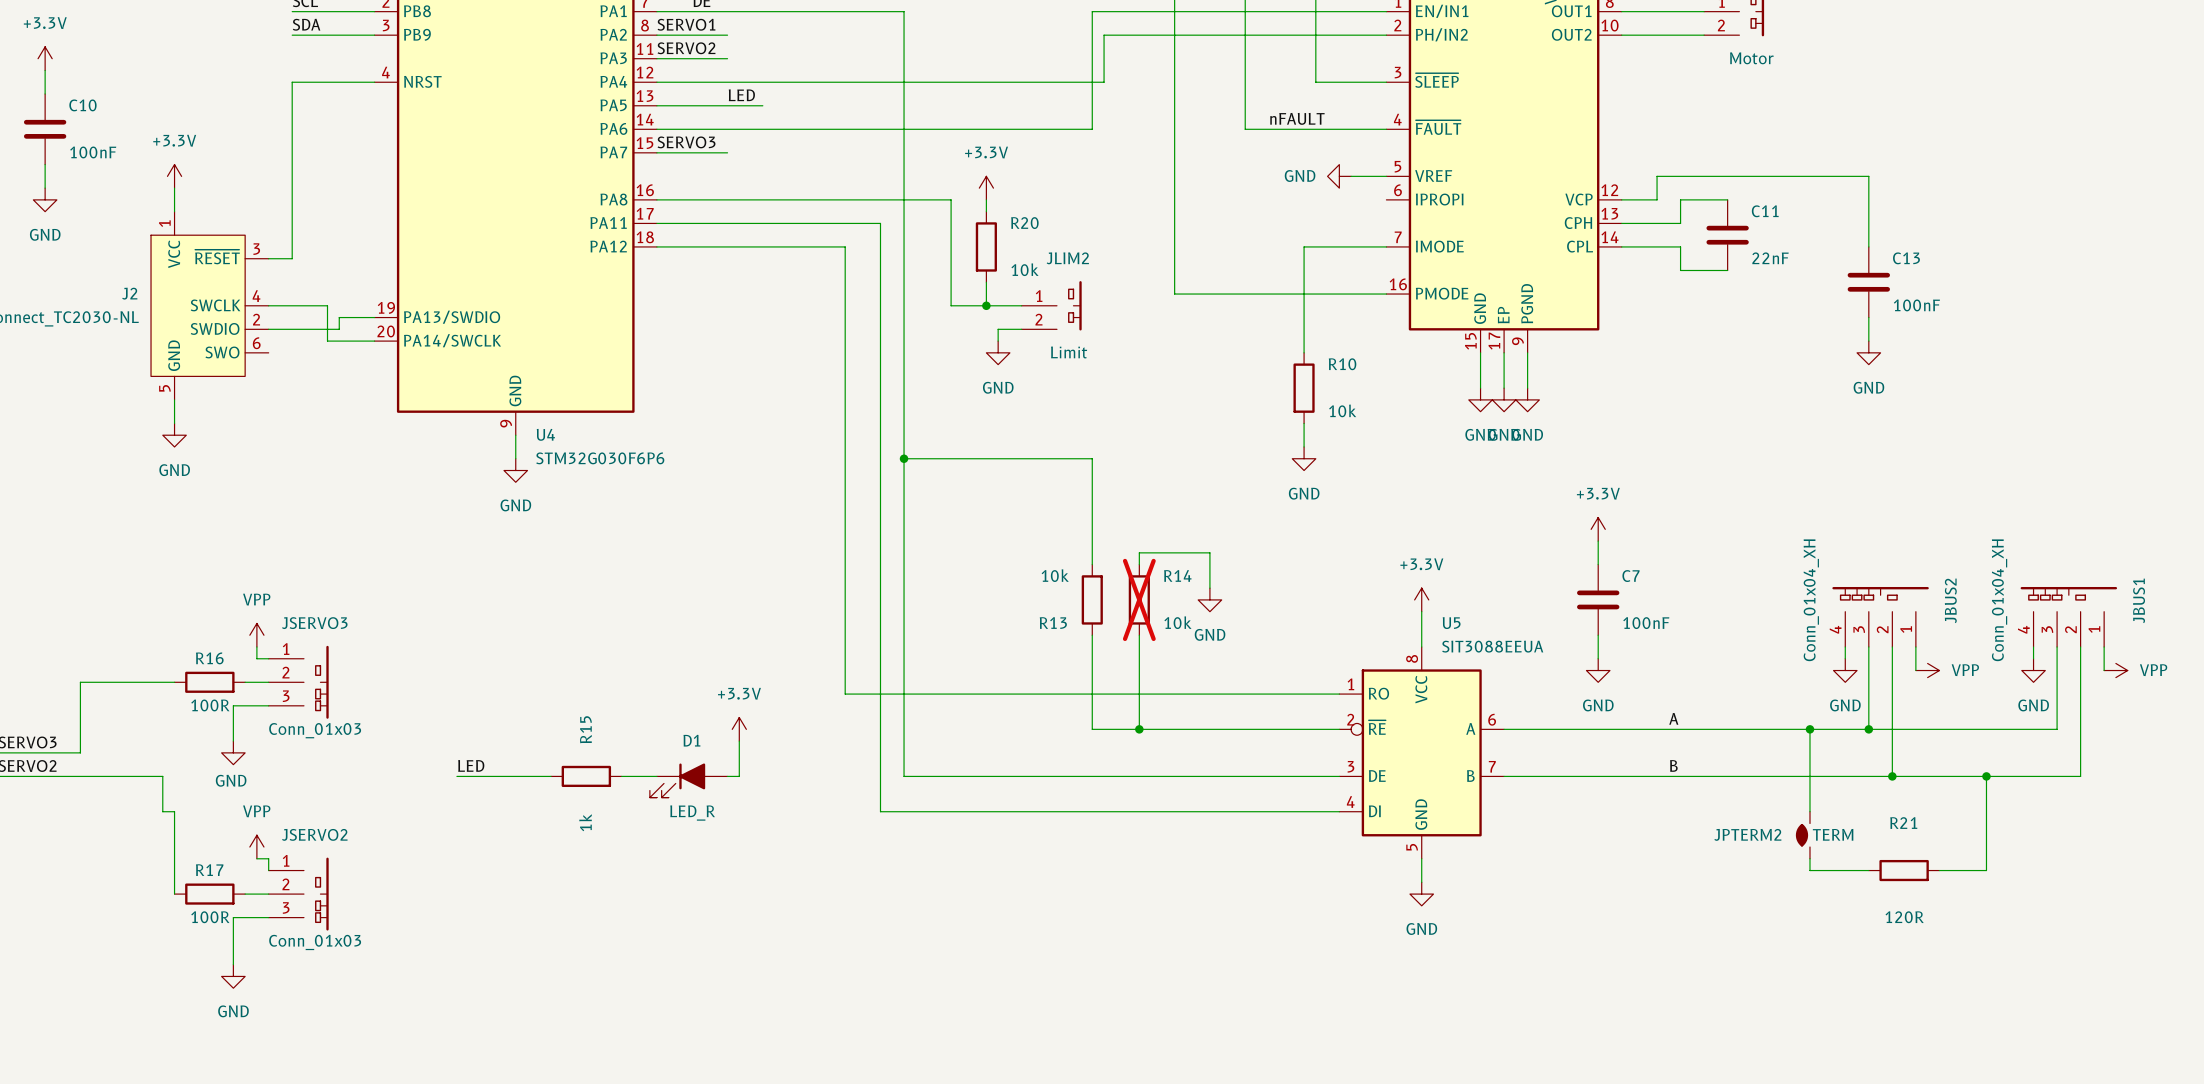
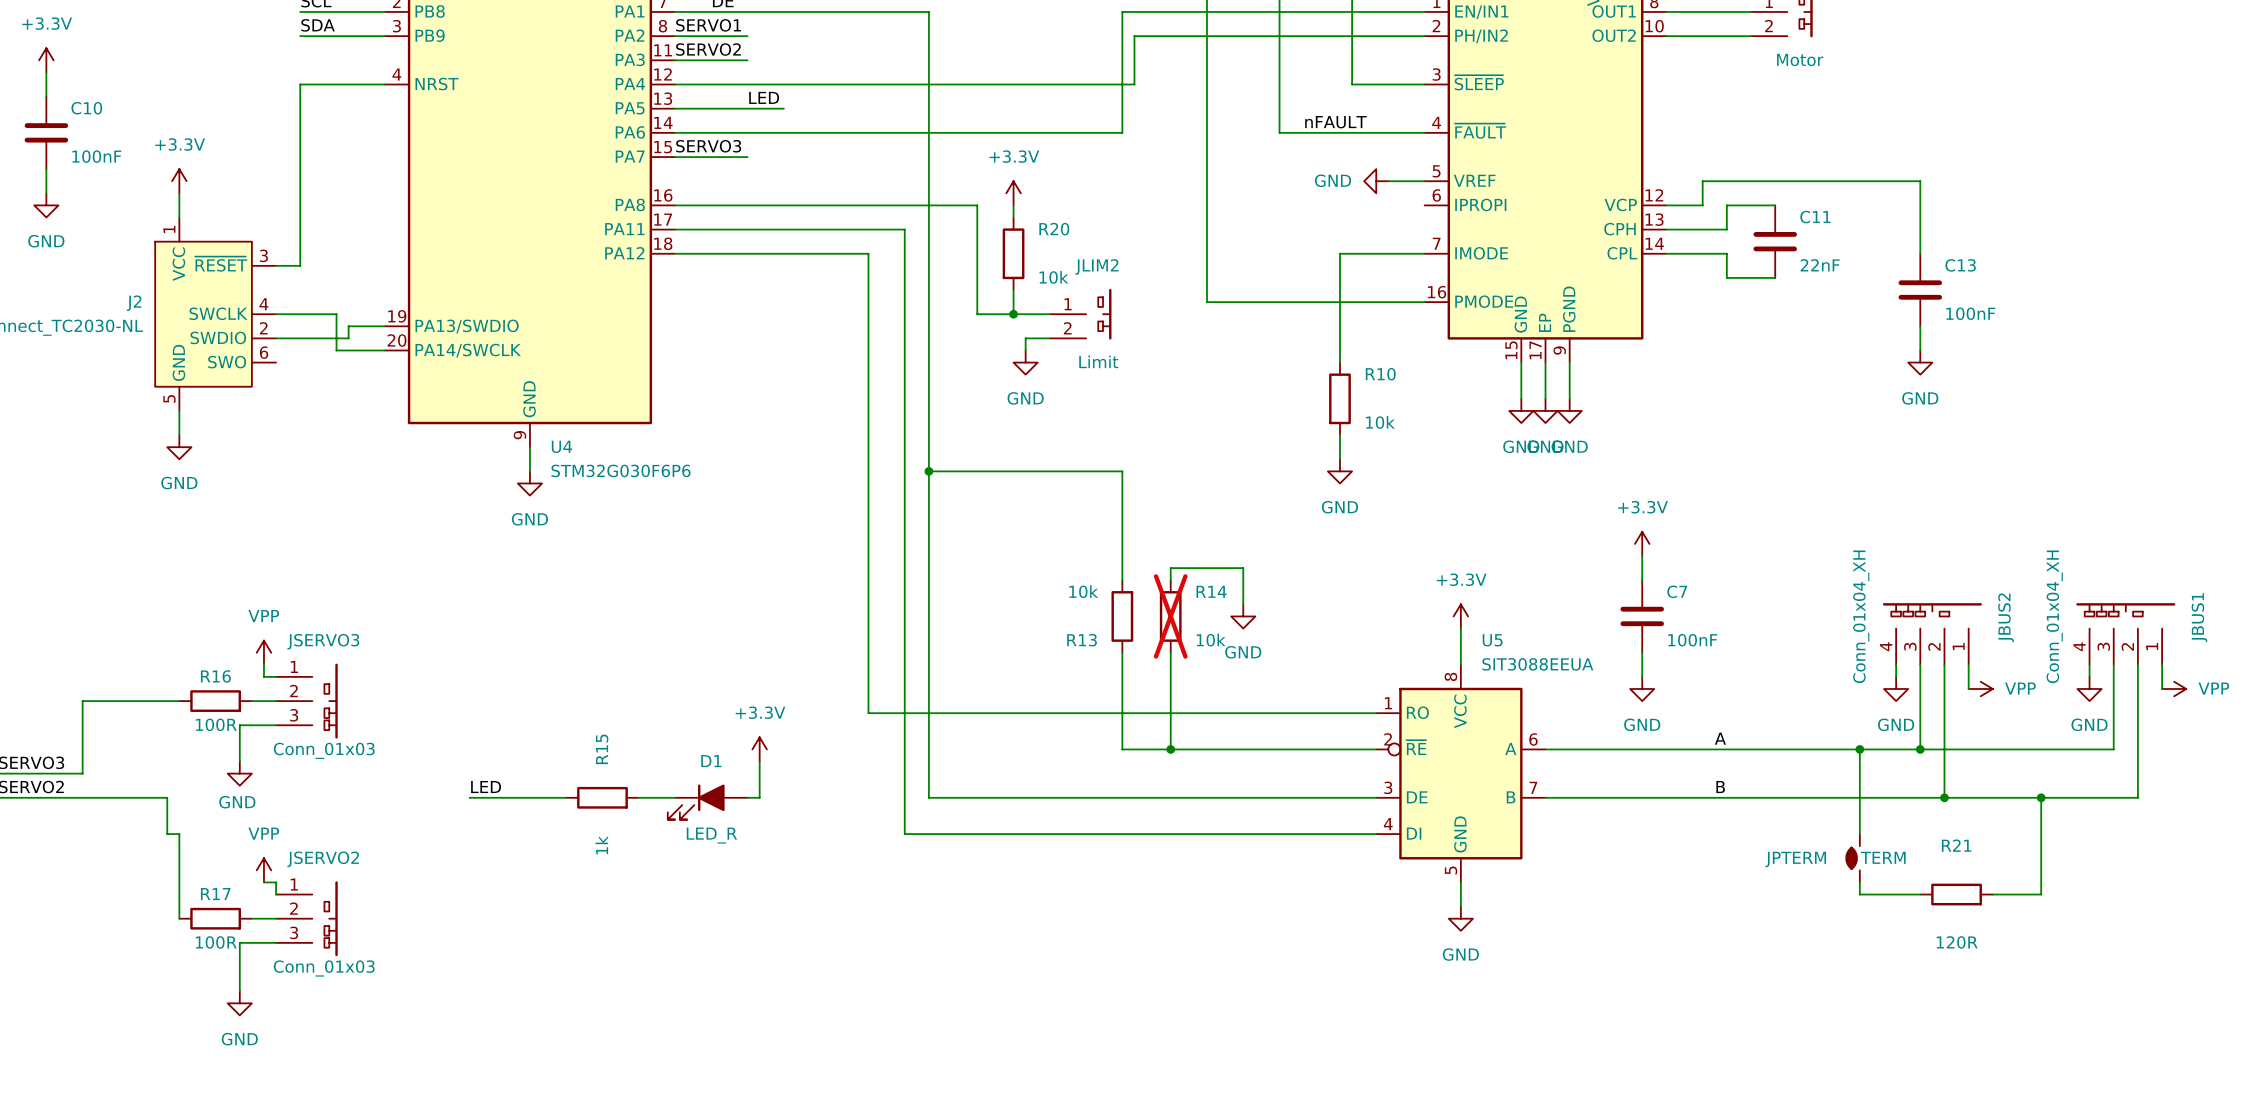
JPTERM2 name: JPTERM2 (1747, 834) -> JPTERM (1795, 859)

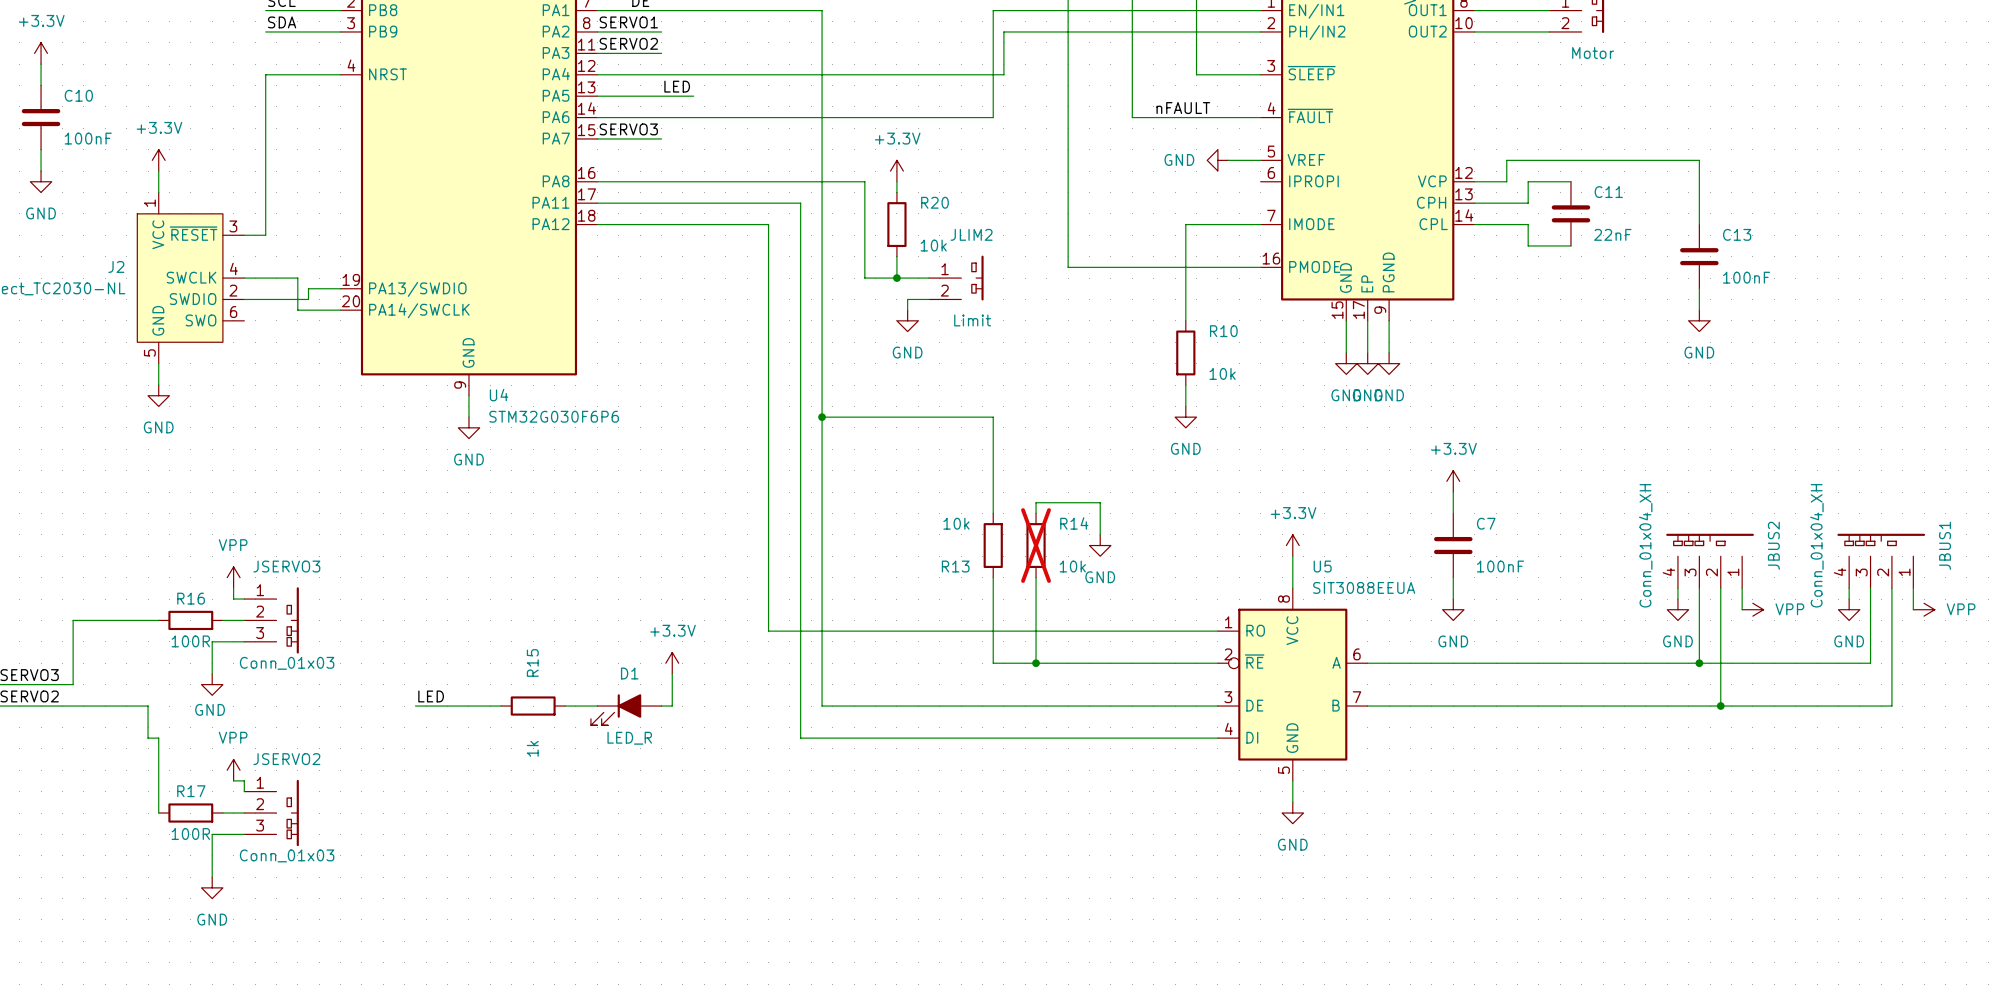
label: A (1720, 738) -> none
wire: (1859, 749) (1859, 834) -> none
junction: (1859, 749) -> none
label: B (1720, 787) -> none
wire: (2041, 797) (2041, 894) (1992, 894) -> none
junction: (2041, 797) -> none
JPTERM: TERM (1852, 858) -> none
wire: (1859, 882) (1859, 894) (1920, 894) -> none
R21: 120R (1956, 894) -> none

